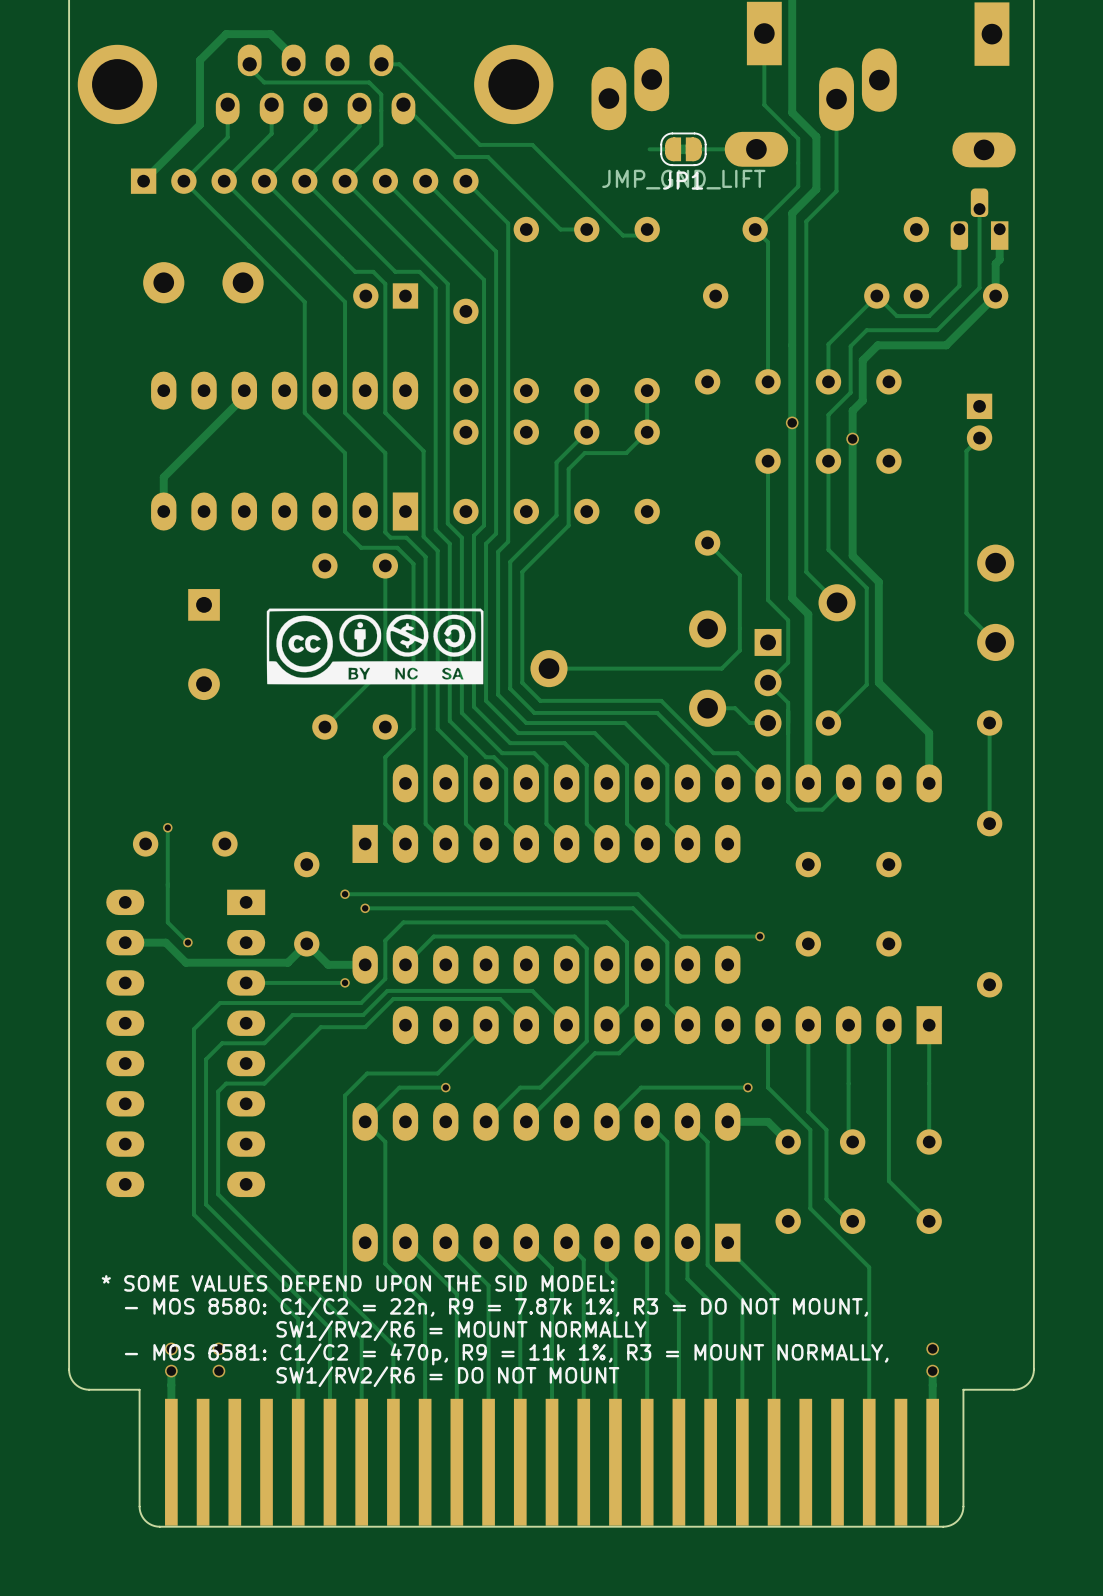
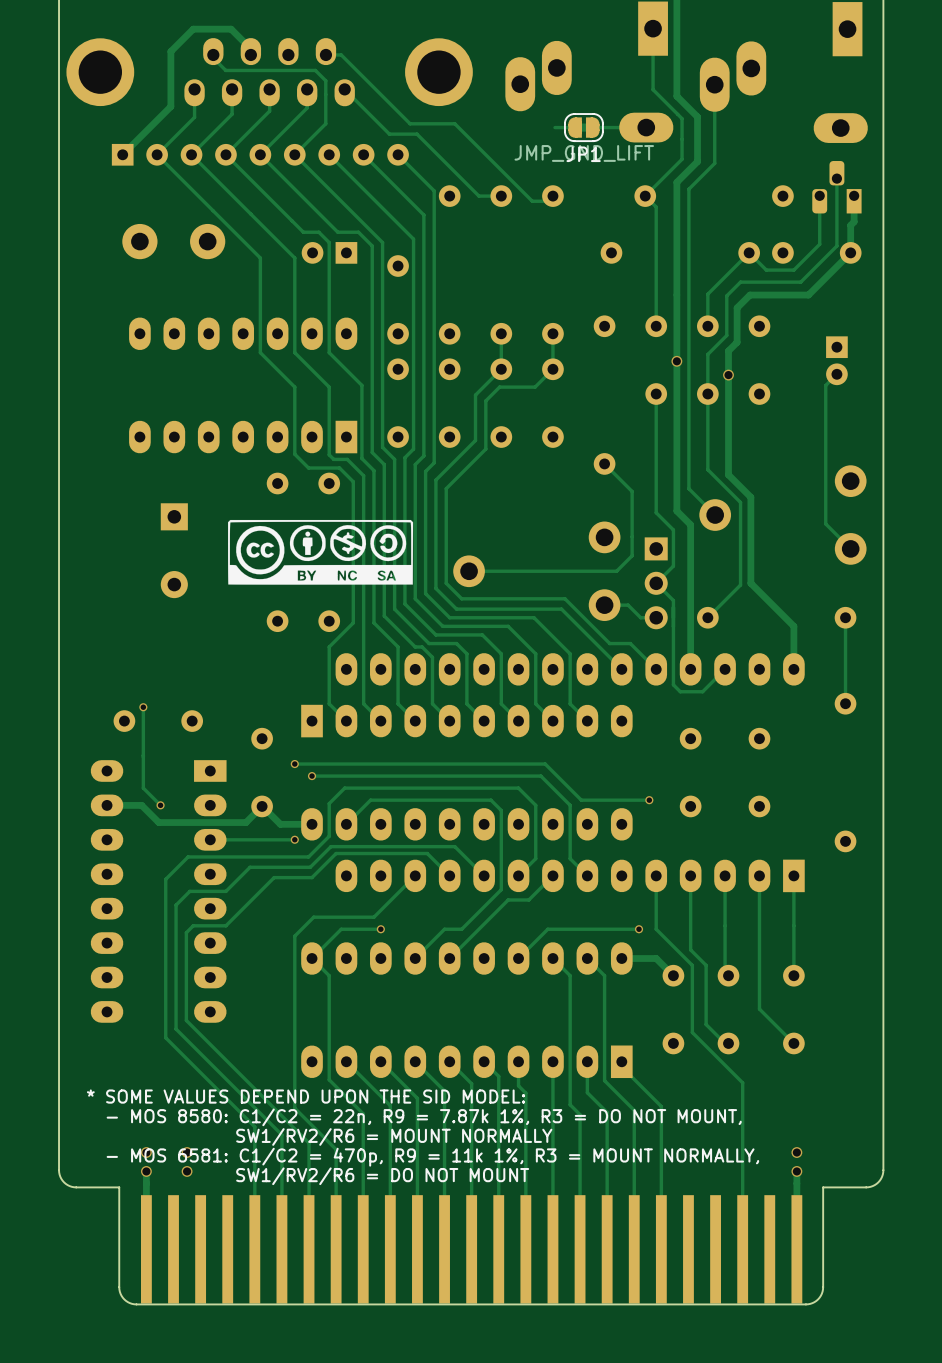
track: (244, 390) (244, 396) (163, 477) (163, 511) -> none
track: (385, 565) (385, 666) (324, 727) -> none

